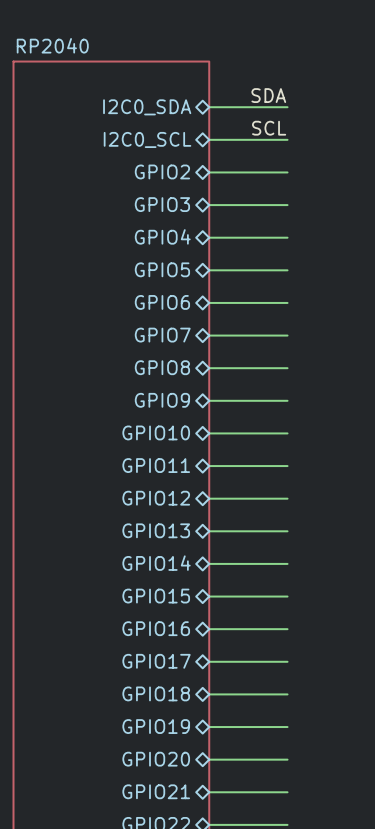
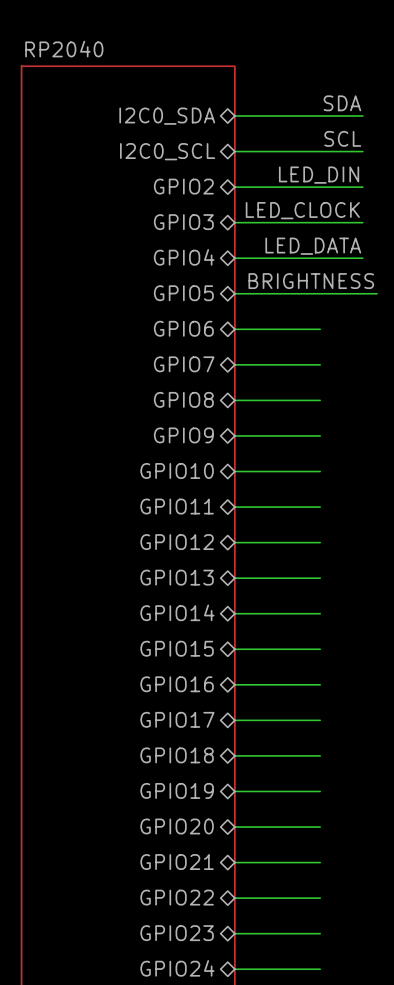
label position: SDA (268, 95) -> SDA (342, 103)
wire: none -> (320, 116) (362, 116)
label position: SCL (269, 128) -> SCL (342, 138)
wire: none -> (320, 151) (362, 151)
label: none -> LED_DIN (319, 175)
wire: none -> (320, 187) (362, 187)
label: none -> LED_CLOCK (302, 210)
wire: none -> (320, 222) (362, 222)
label: none -> LED_DATA (313, 246)
wire: none -> (320, 258) (362, 258)
label: none -> BRIGHTNESS (311, 281)
wire: none -> (320, 293) (377, 293)

